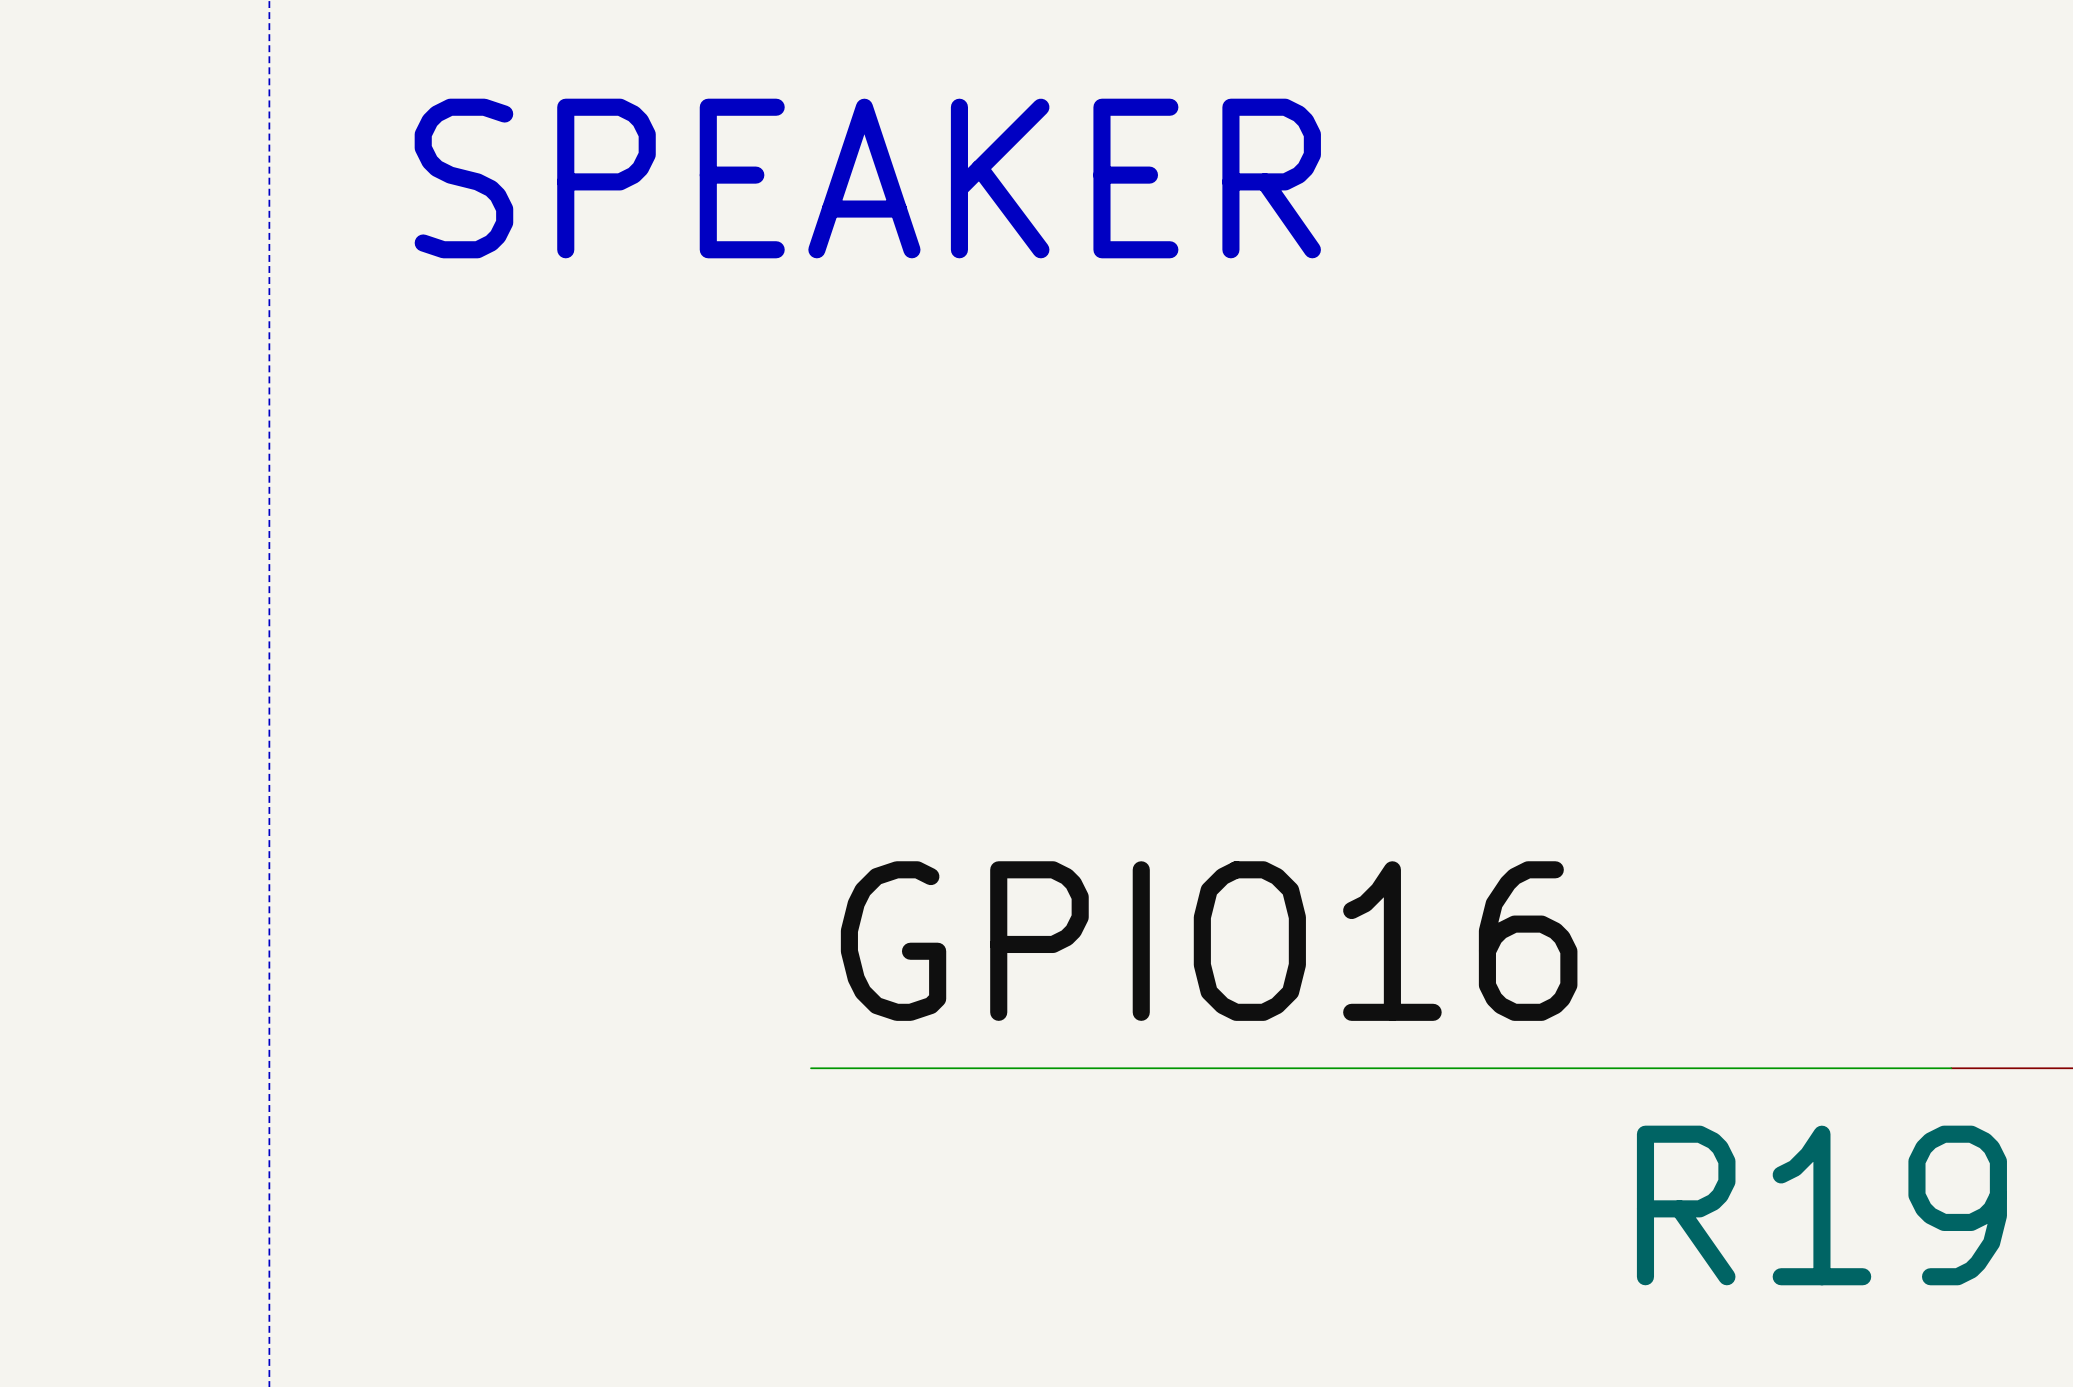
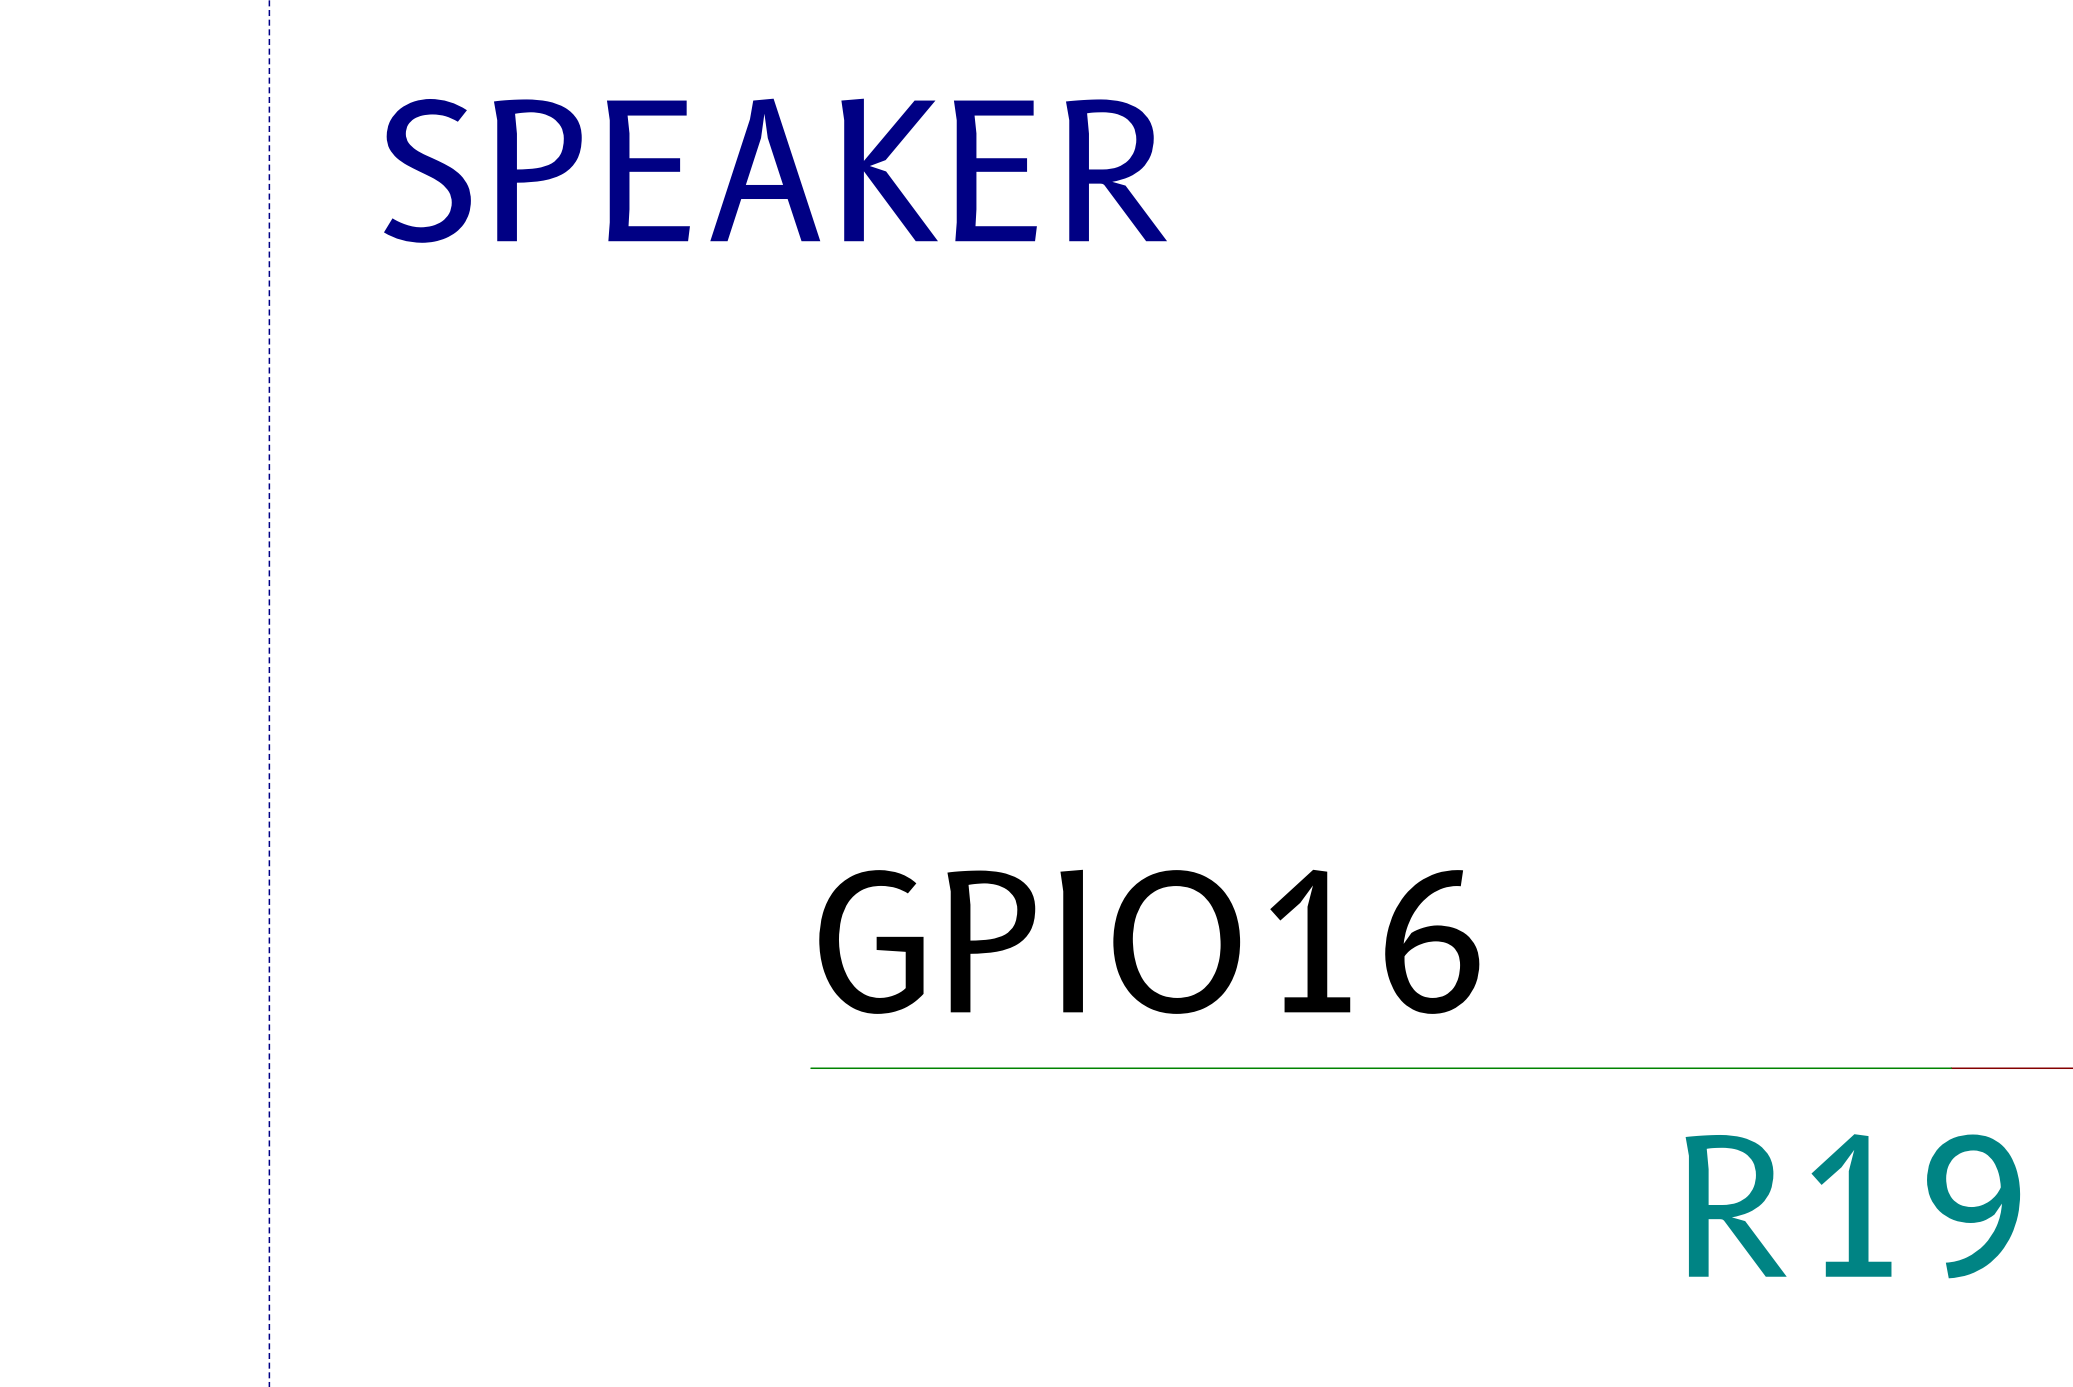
text position: SPEAKER (867, 178) -> SPEAKER (775, 170)

